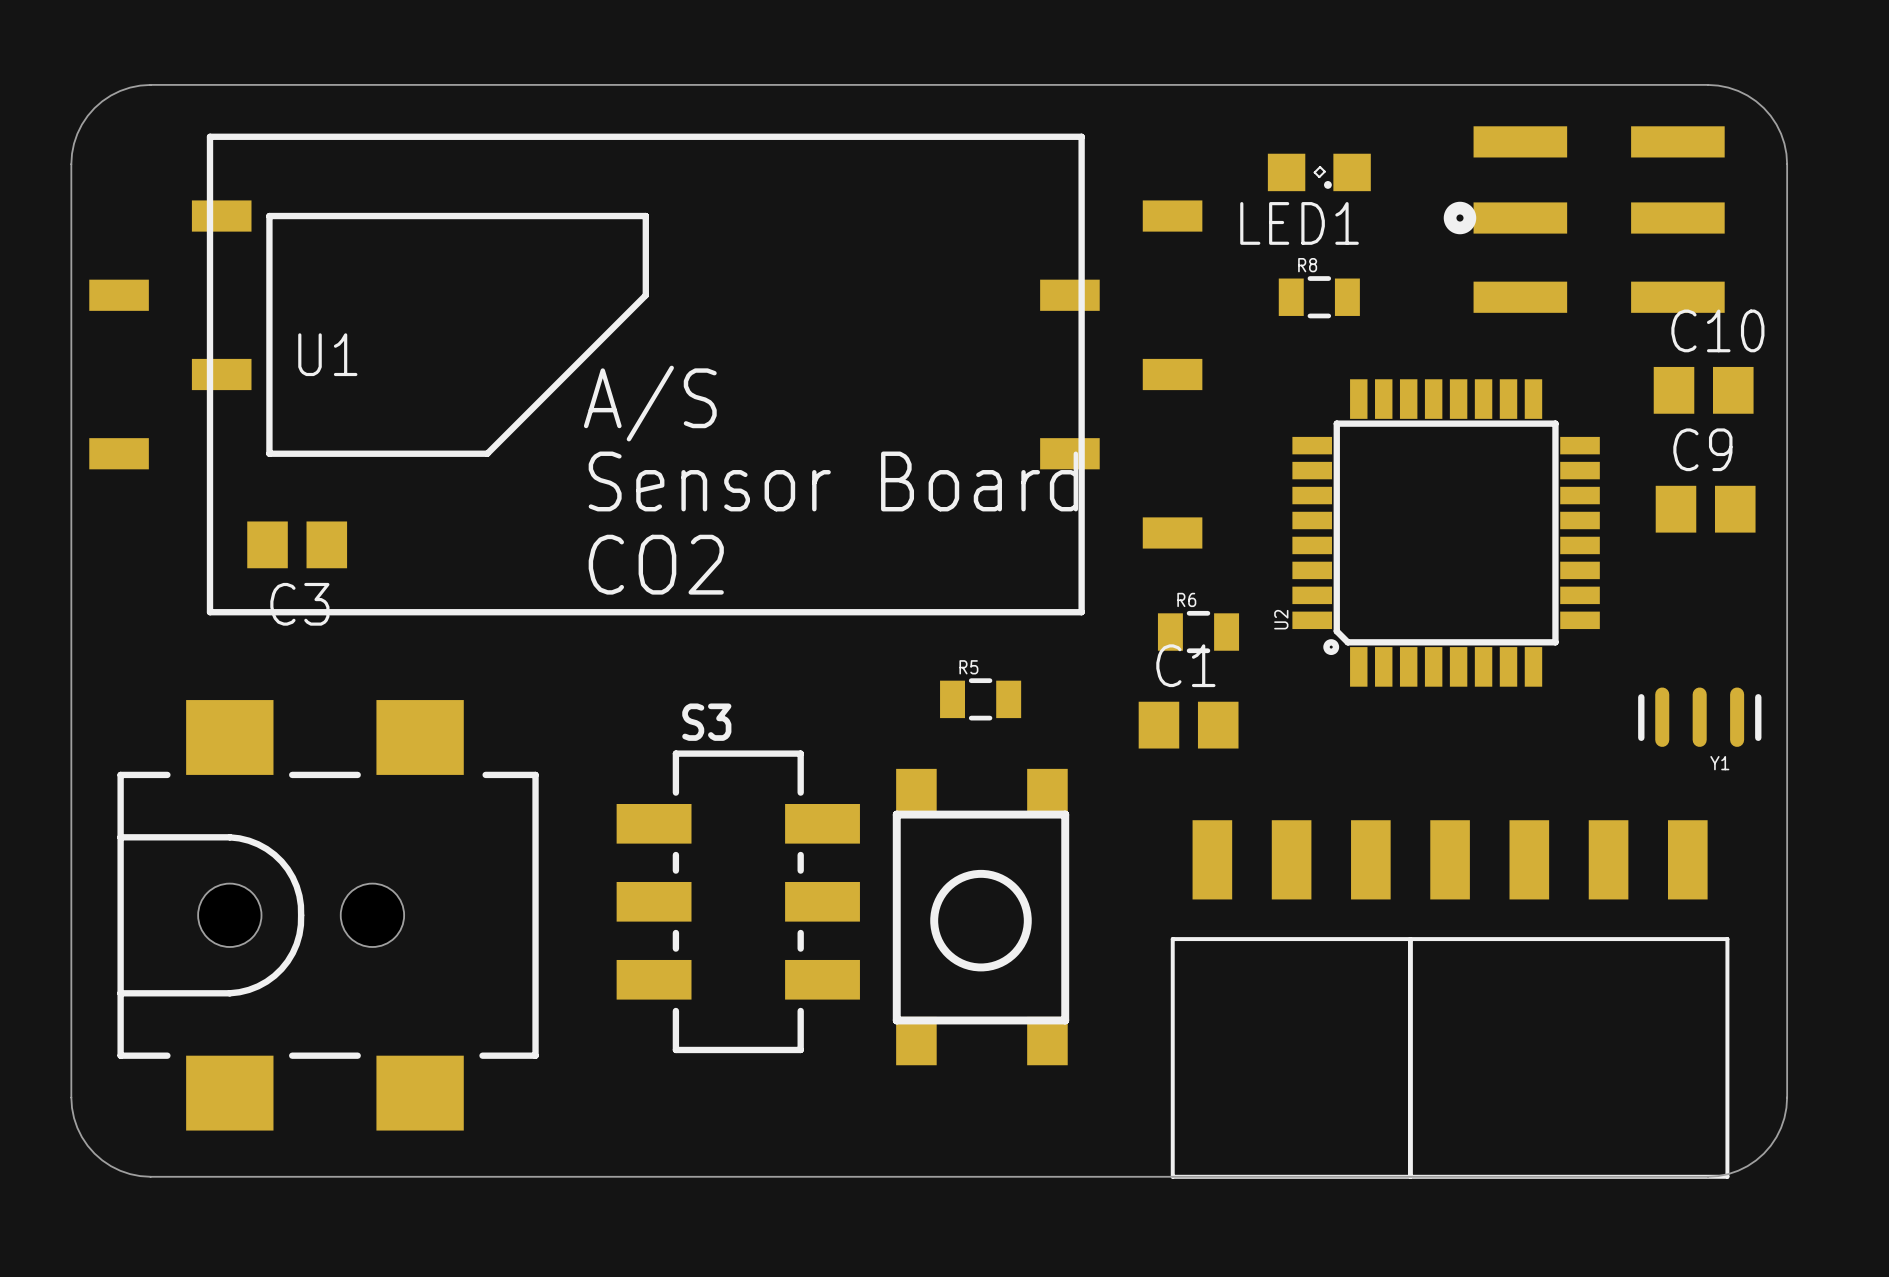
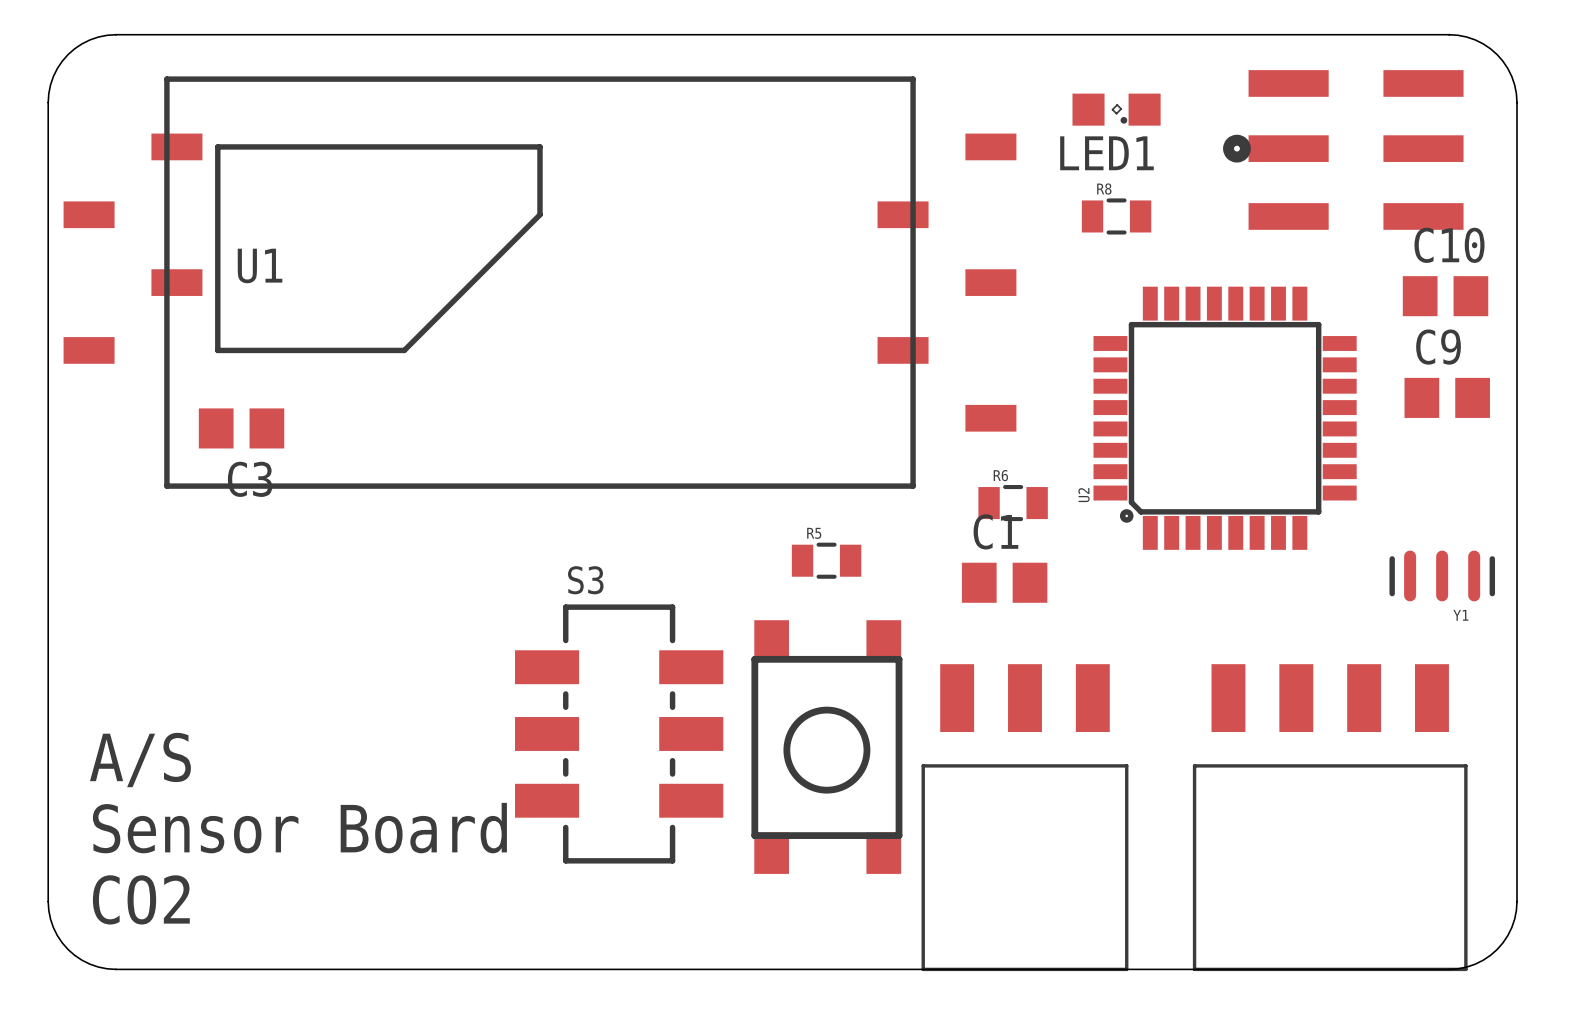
text position: A/S (650, 403) -> A/S (140, 760)
text position: Sensor Board (833, 481) -> Sensor Board (299, 828)
text position: CO2 (656, 564) -> CO2 (141, 899)
part: (328, 915) -> none
part position: (1291, 999) -> (1024, 817)

